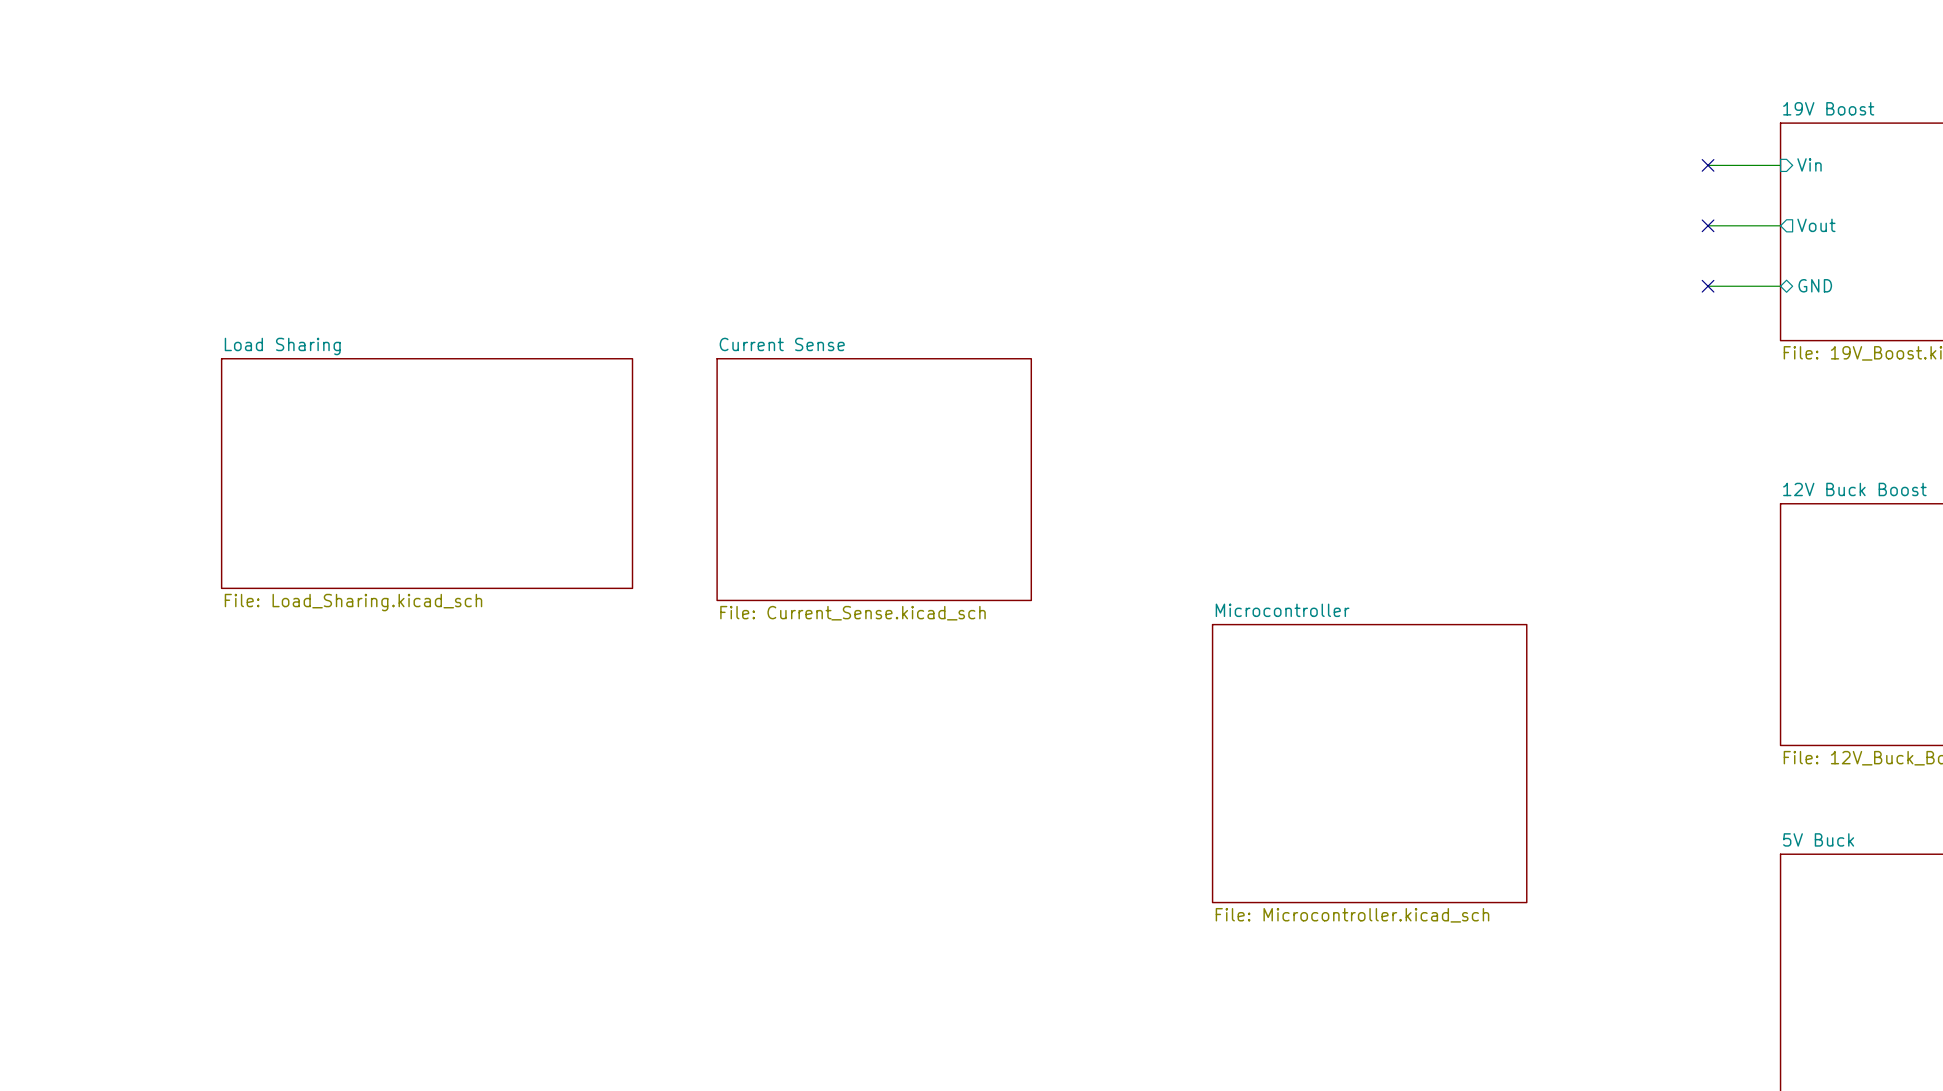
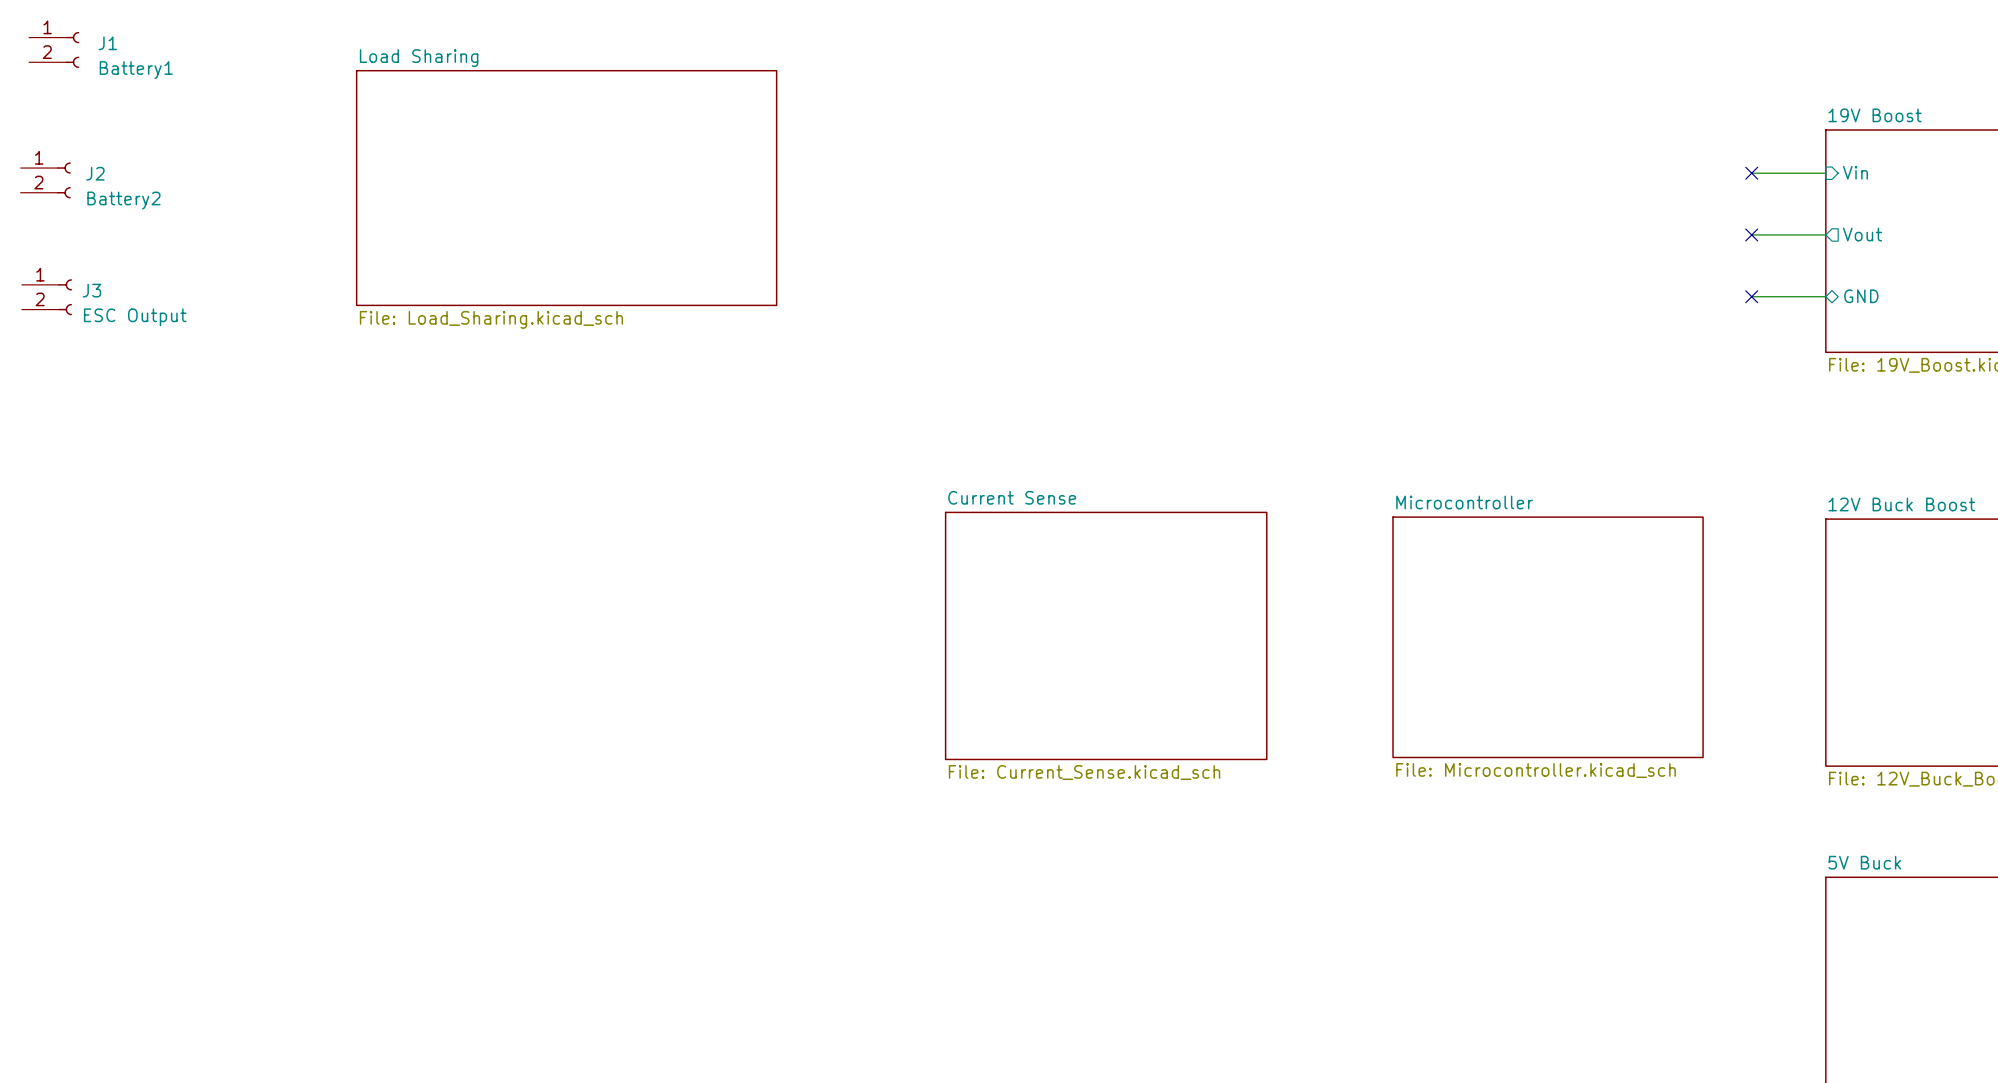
J1: none -> Battery1 (54, 49)
J2: none -> Battery2 (45, 180)
sheet Load Sharing: none -> File: Load_Sharing.kicad_sch (566, 188)
J3: none -> ESC Output (46, 297)
sheet Load Sharing: File: Load_Sharing.kicad_sch (427, 473) -> none
sheet Current Sense: File: Current_Sense.kicad_sch (874, 479) -> none
sheet Current Sense: none -> File: Current_Sense.kicad_sch (1106, 635)
sheet Microcontroller: none -> File: Microcontroller.kicad_sch (1548, 637)
sheet Microcontroller: File: Microcontroller.kicad_sch (1369, 763) -> none

